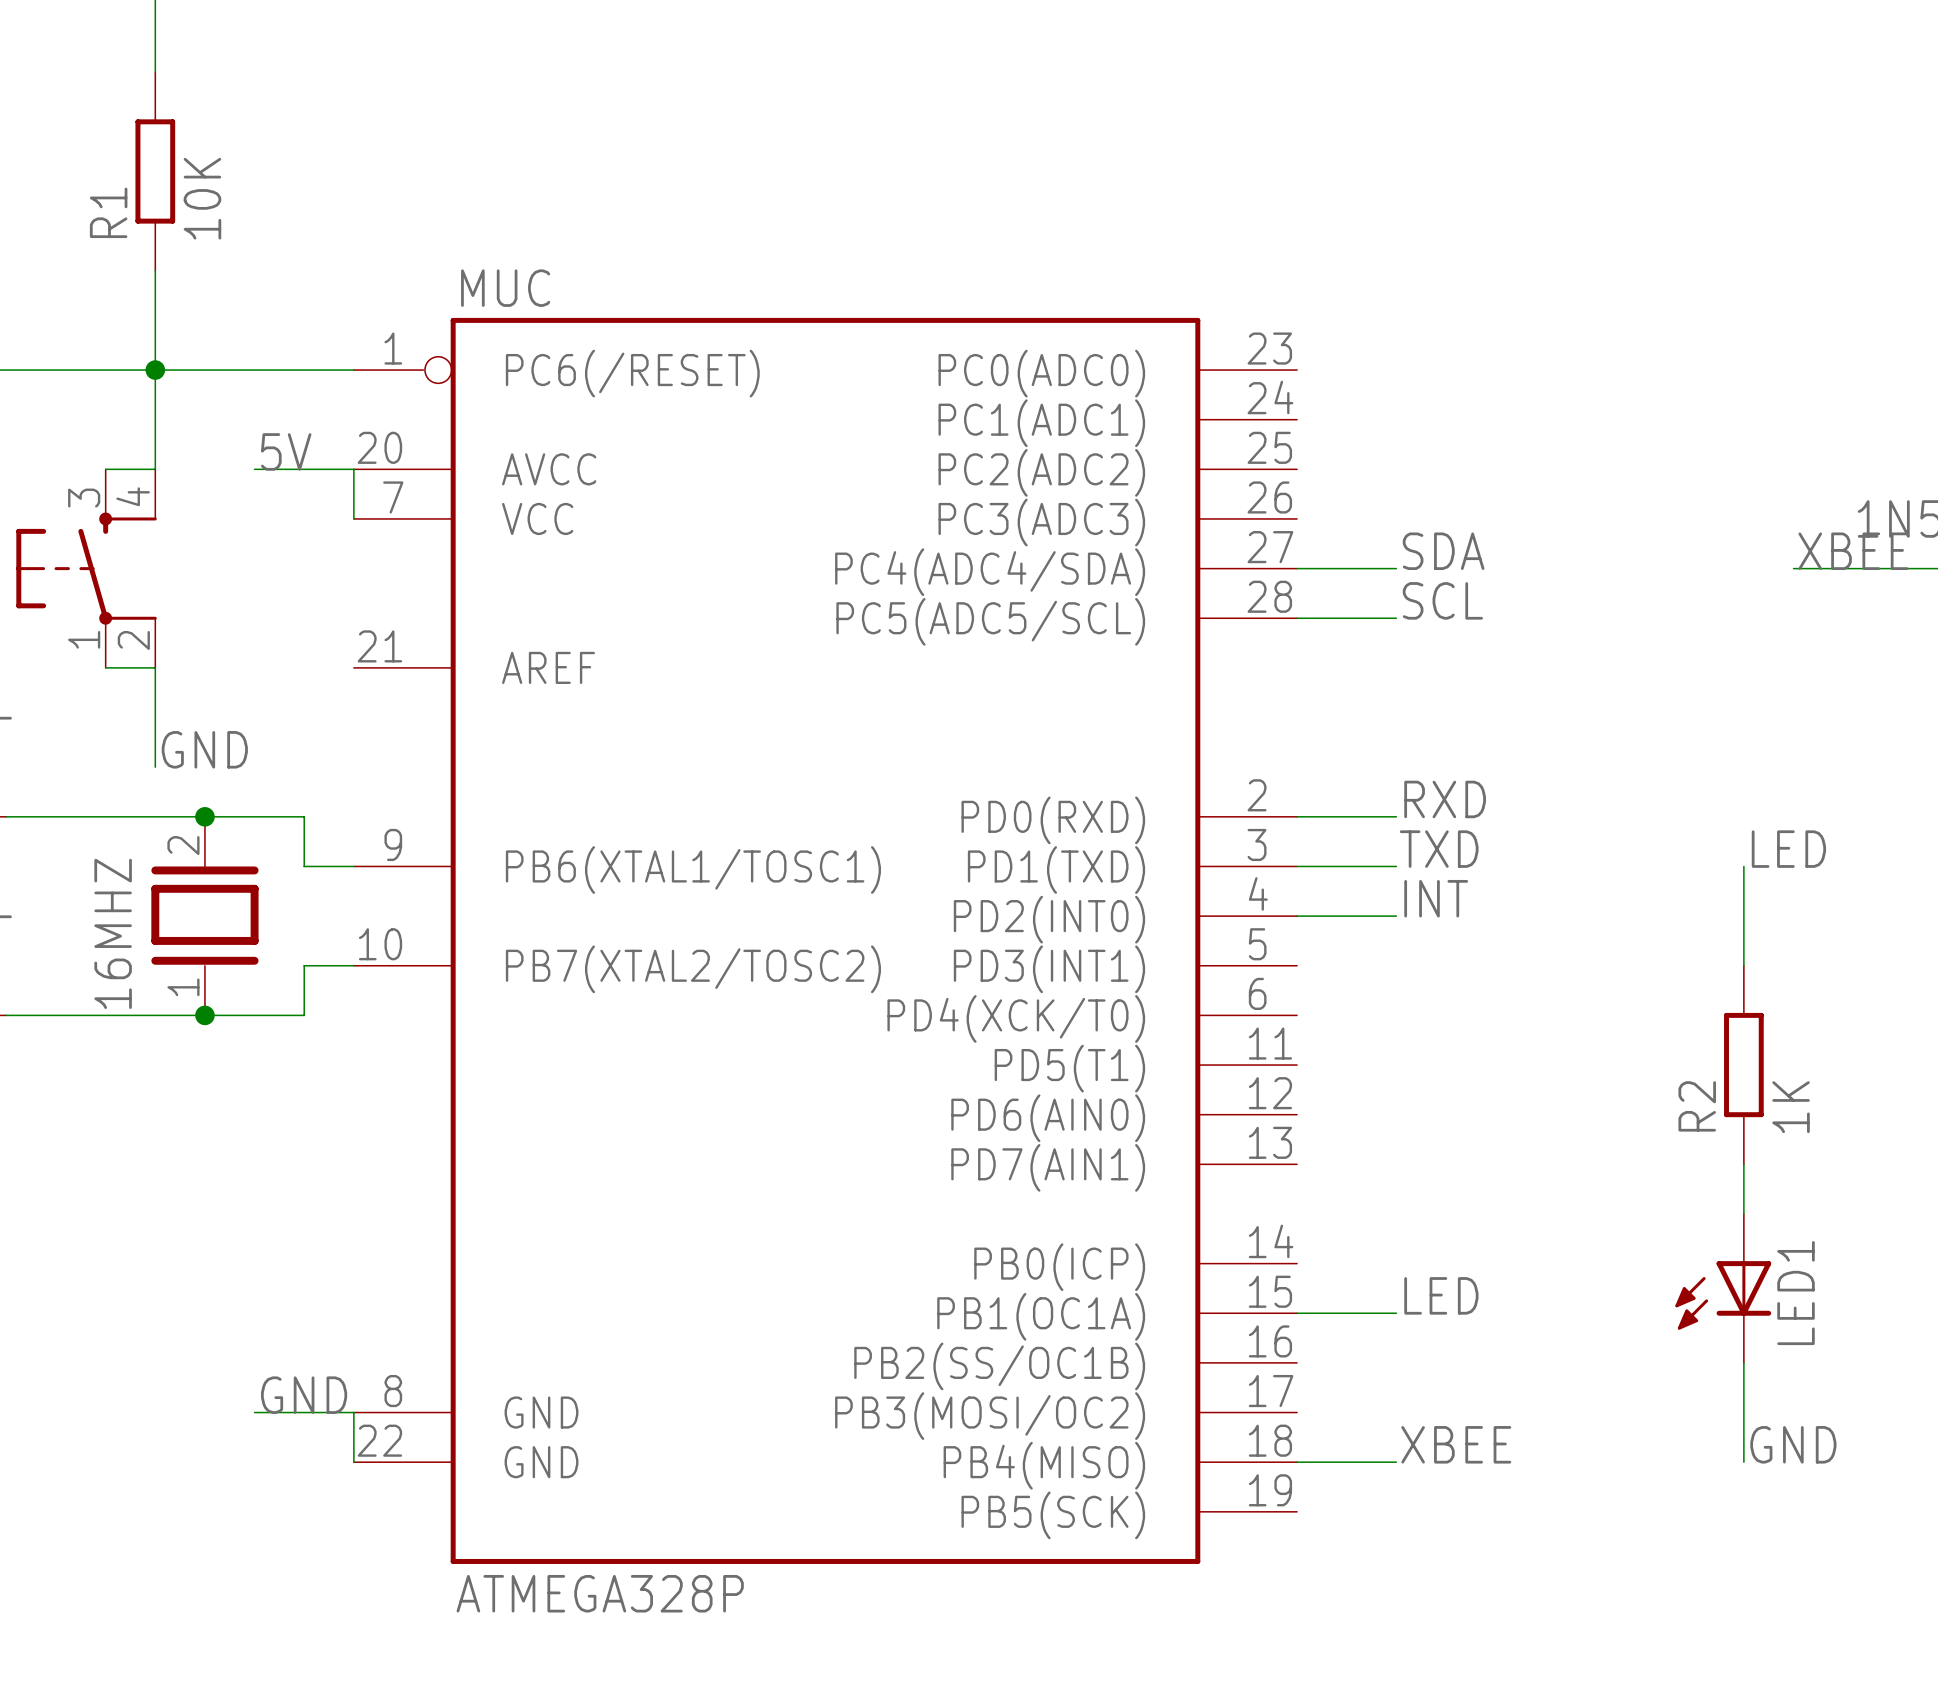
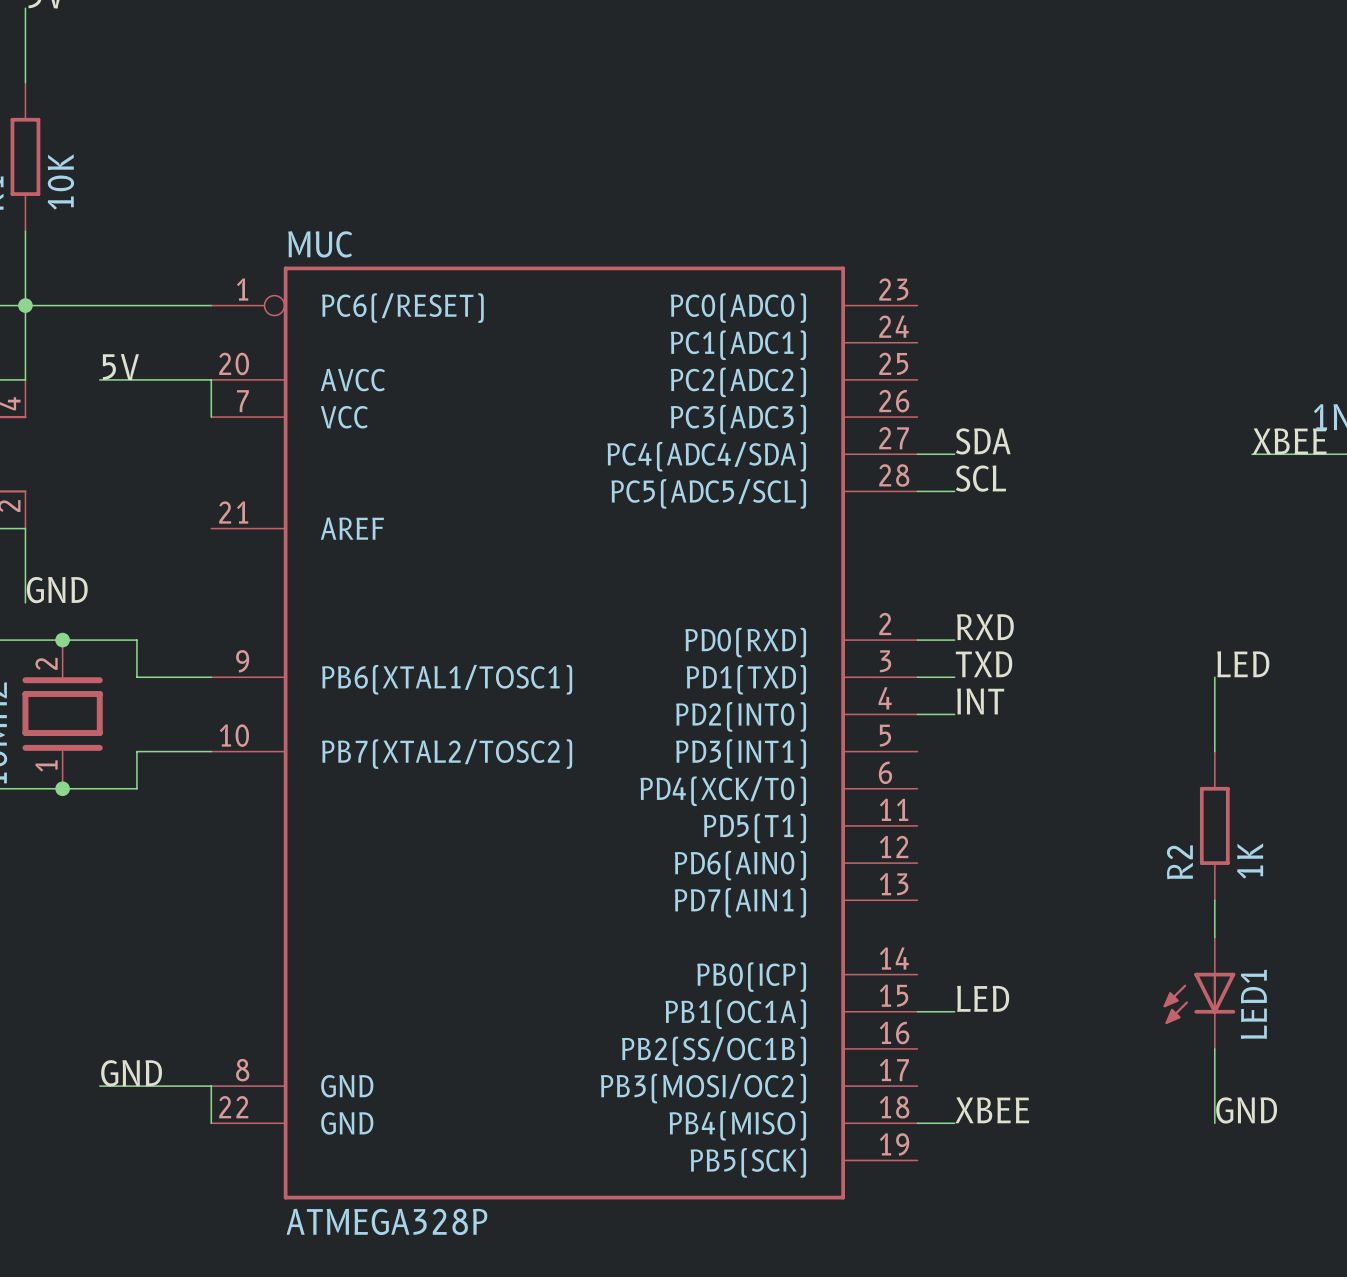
wire: (353, 469) (353, 518) -> (174, 379) (211, 379) (211, 417)
MUC position: (825, 940) -> (564, 733)
wire: (353, 1412) (353, 1462) -> (174, 1086) (211, 1086) (211, 1123)

